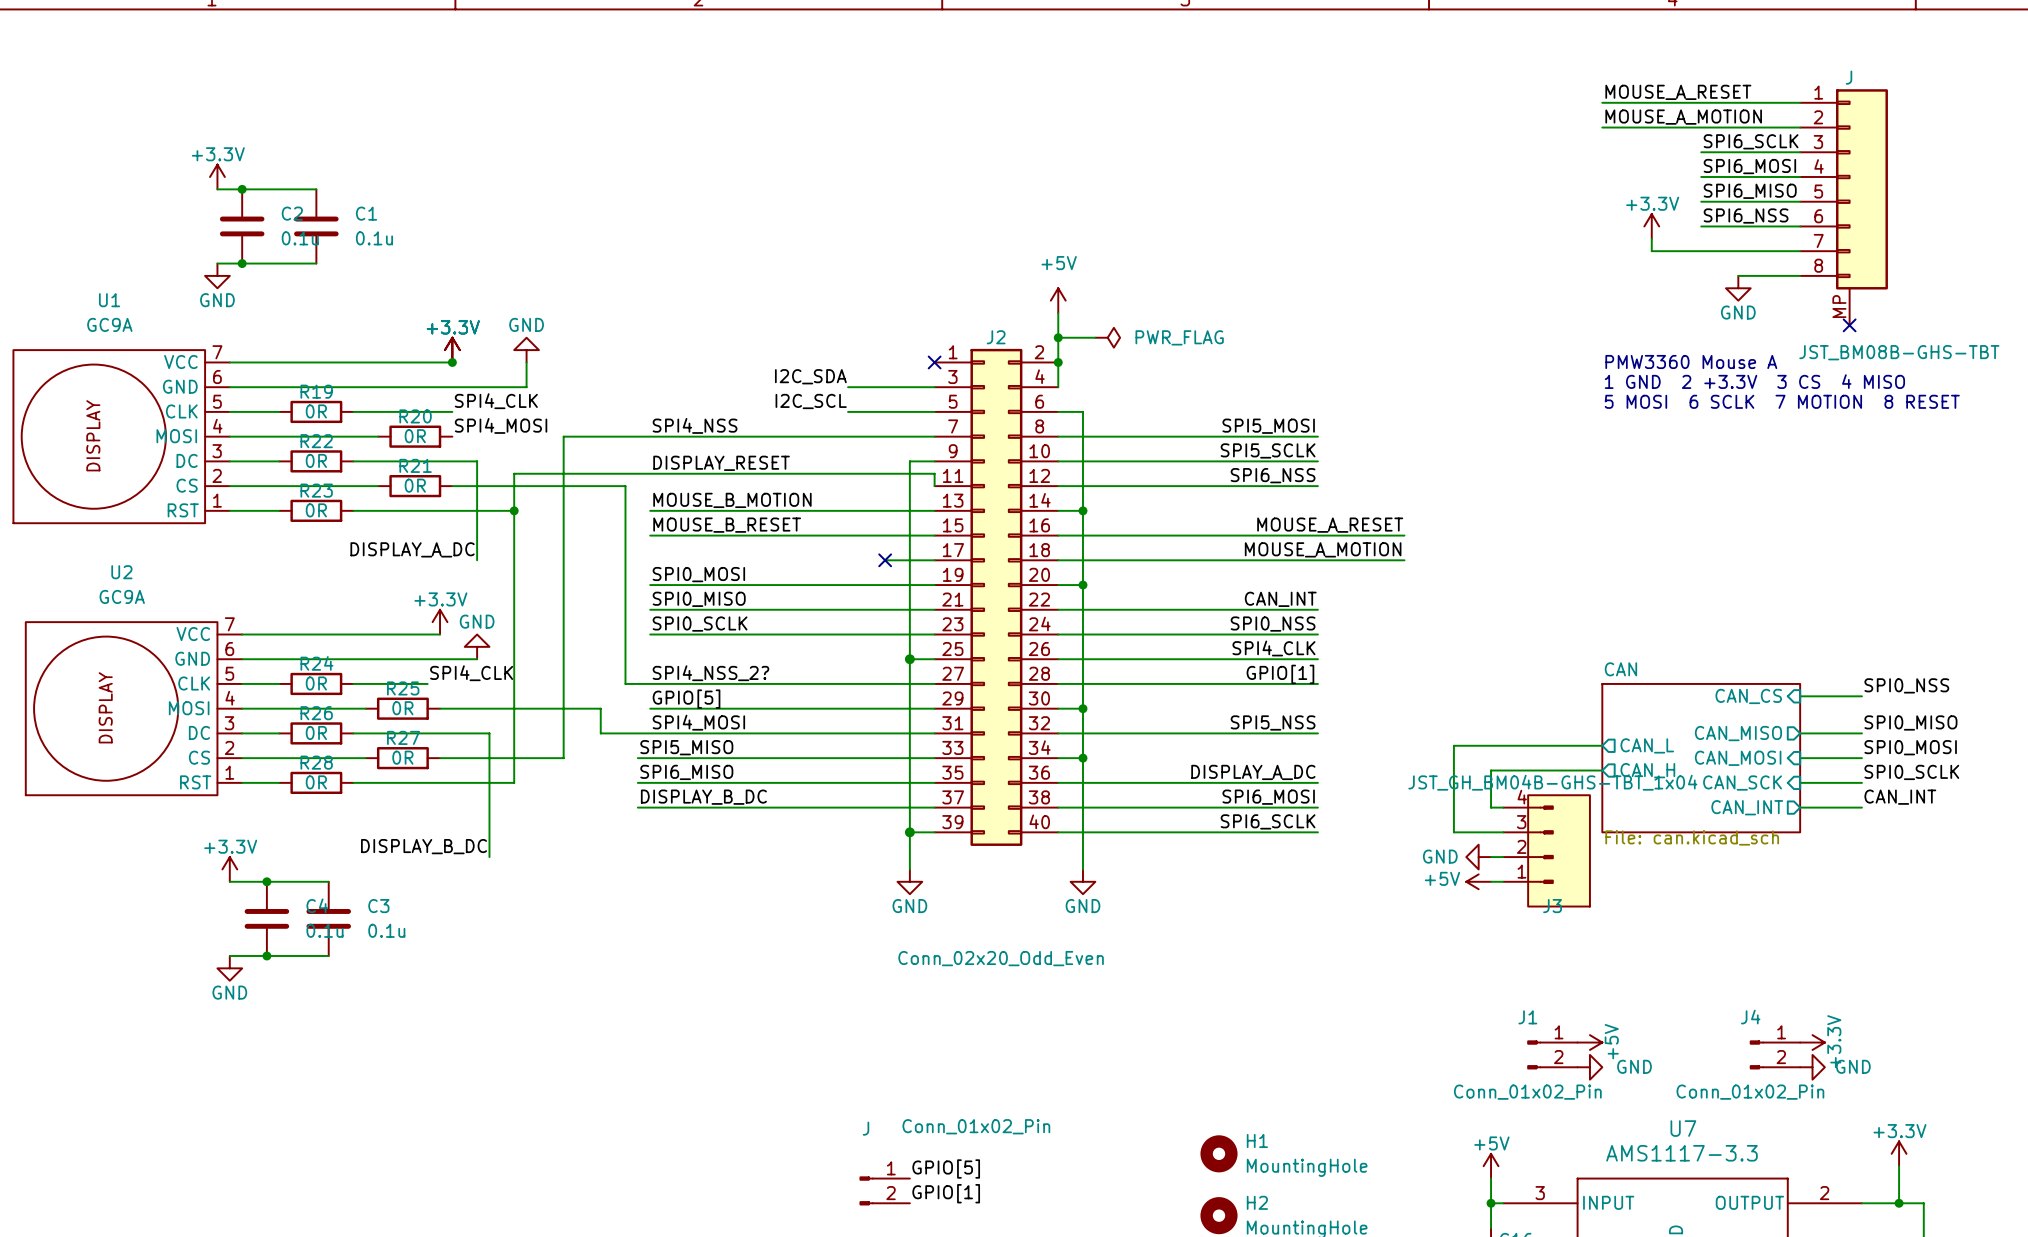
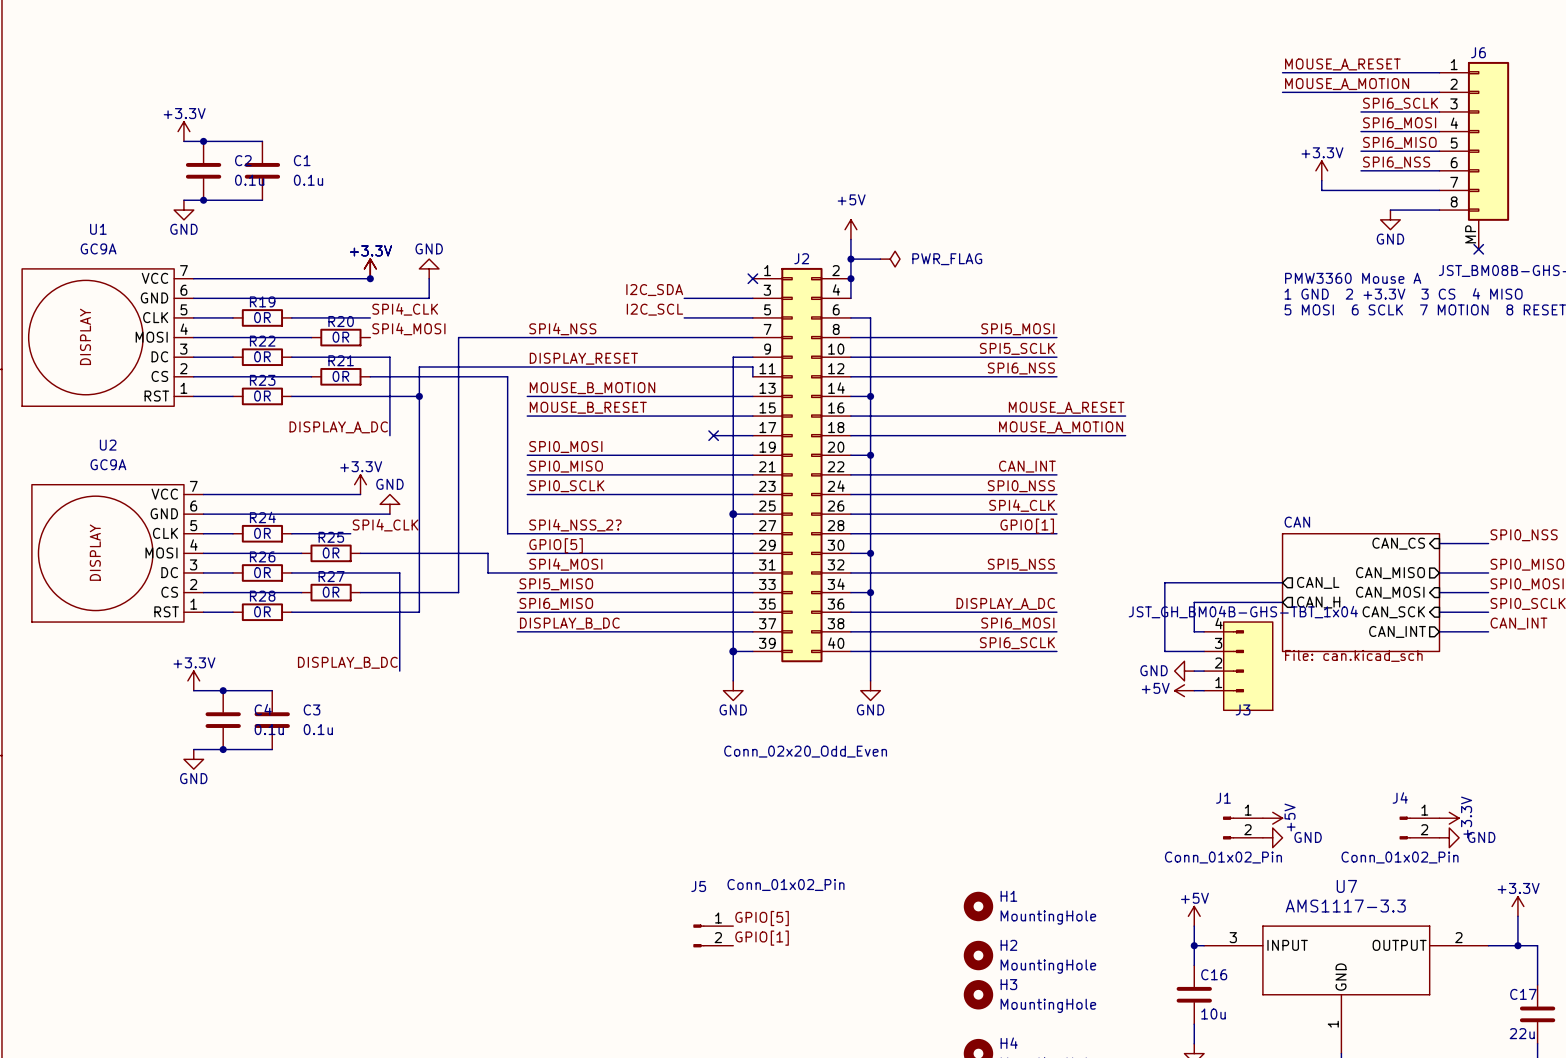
J name: J (1849, 77) -> J6 (1478, 52)
J name: J (866, 1128) -> J5 (698, 886)

